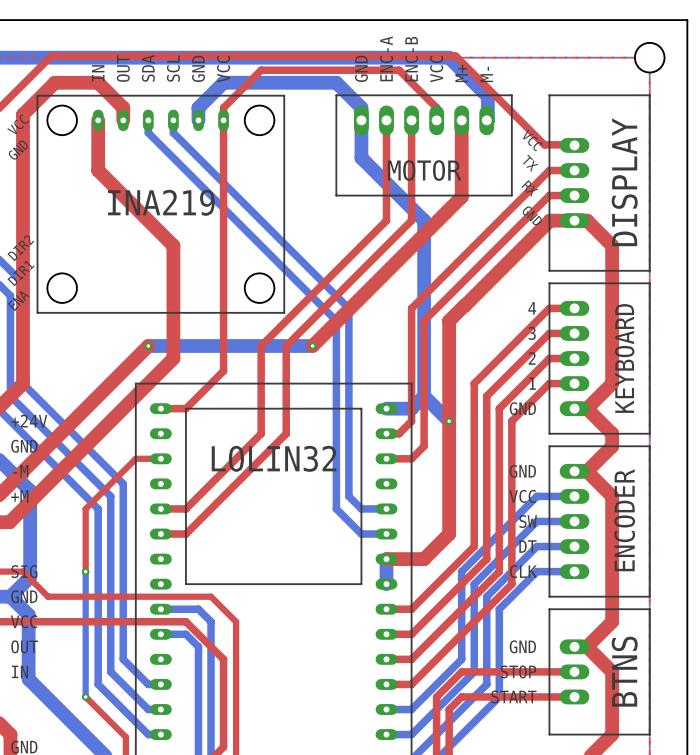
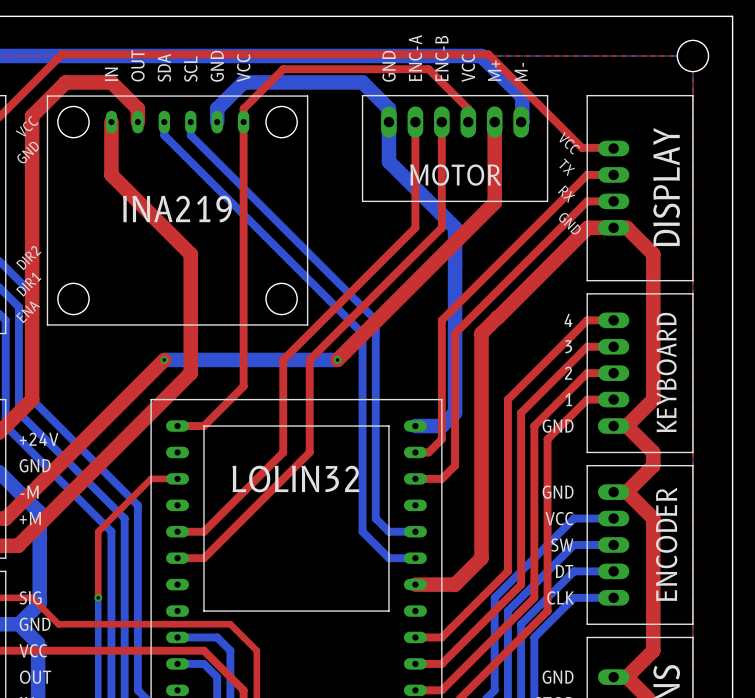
bottom track: (424, 396) (449, 421) -> none
via: (449, 421) -> none
bottom track: (386, 559) (386, 584) -> none

